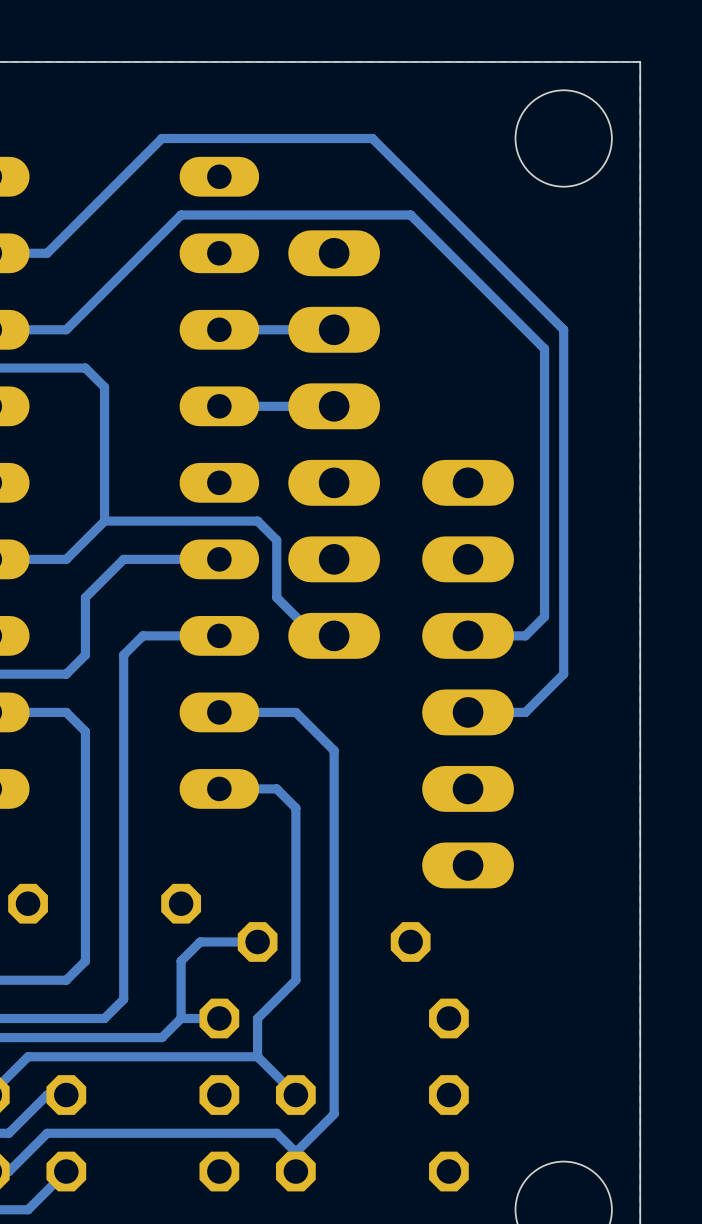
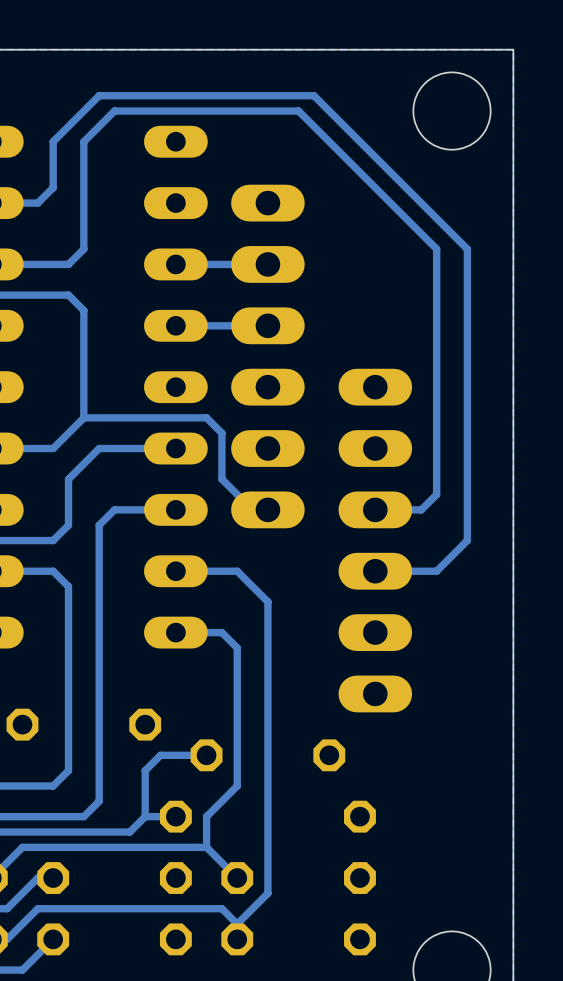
track: (161, 138) (66, 234) -> (129, 111) (114, 111) (83, 141) (83, 249) (68, 264) (53, 264)
track: none -> (53, 187) (53, 141) (99, 95) (313, 95) (467, 249) (467, 540) (436, 571) (421, 571)
track: (544, 310) (563, 329) (563, 674) (525, 712) -> (436, 249) (436, 279)
track: (66, 329) (181, 215) (410, 215) (544, 348) -> none

